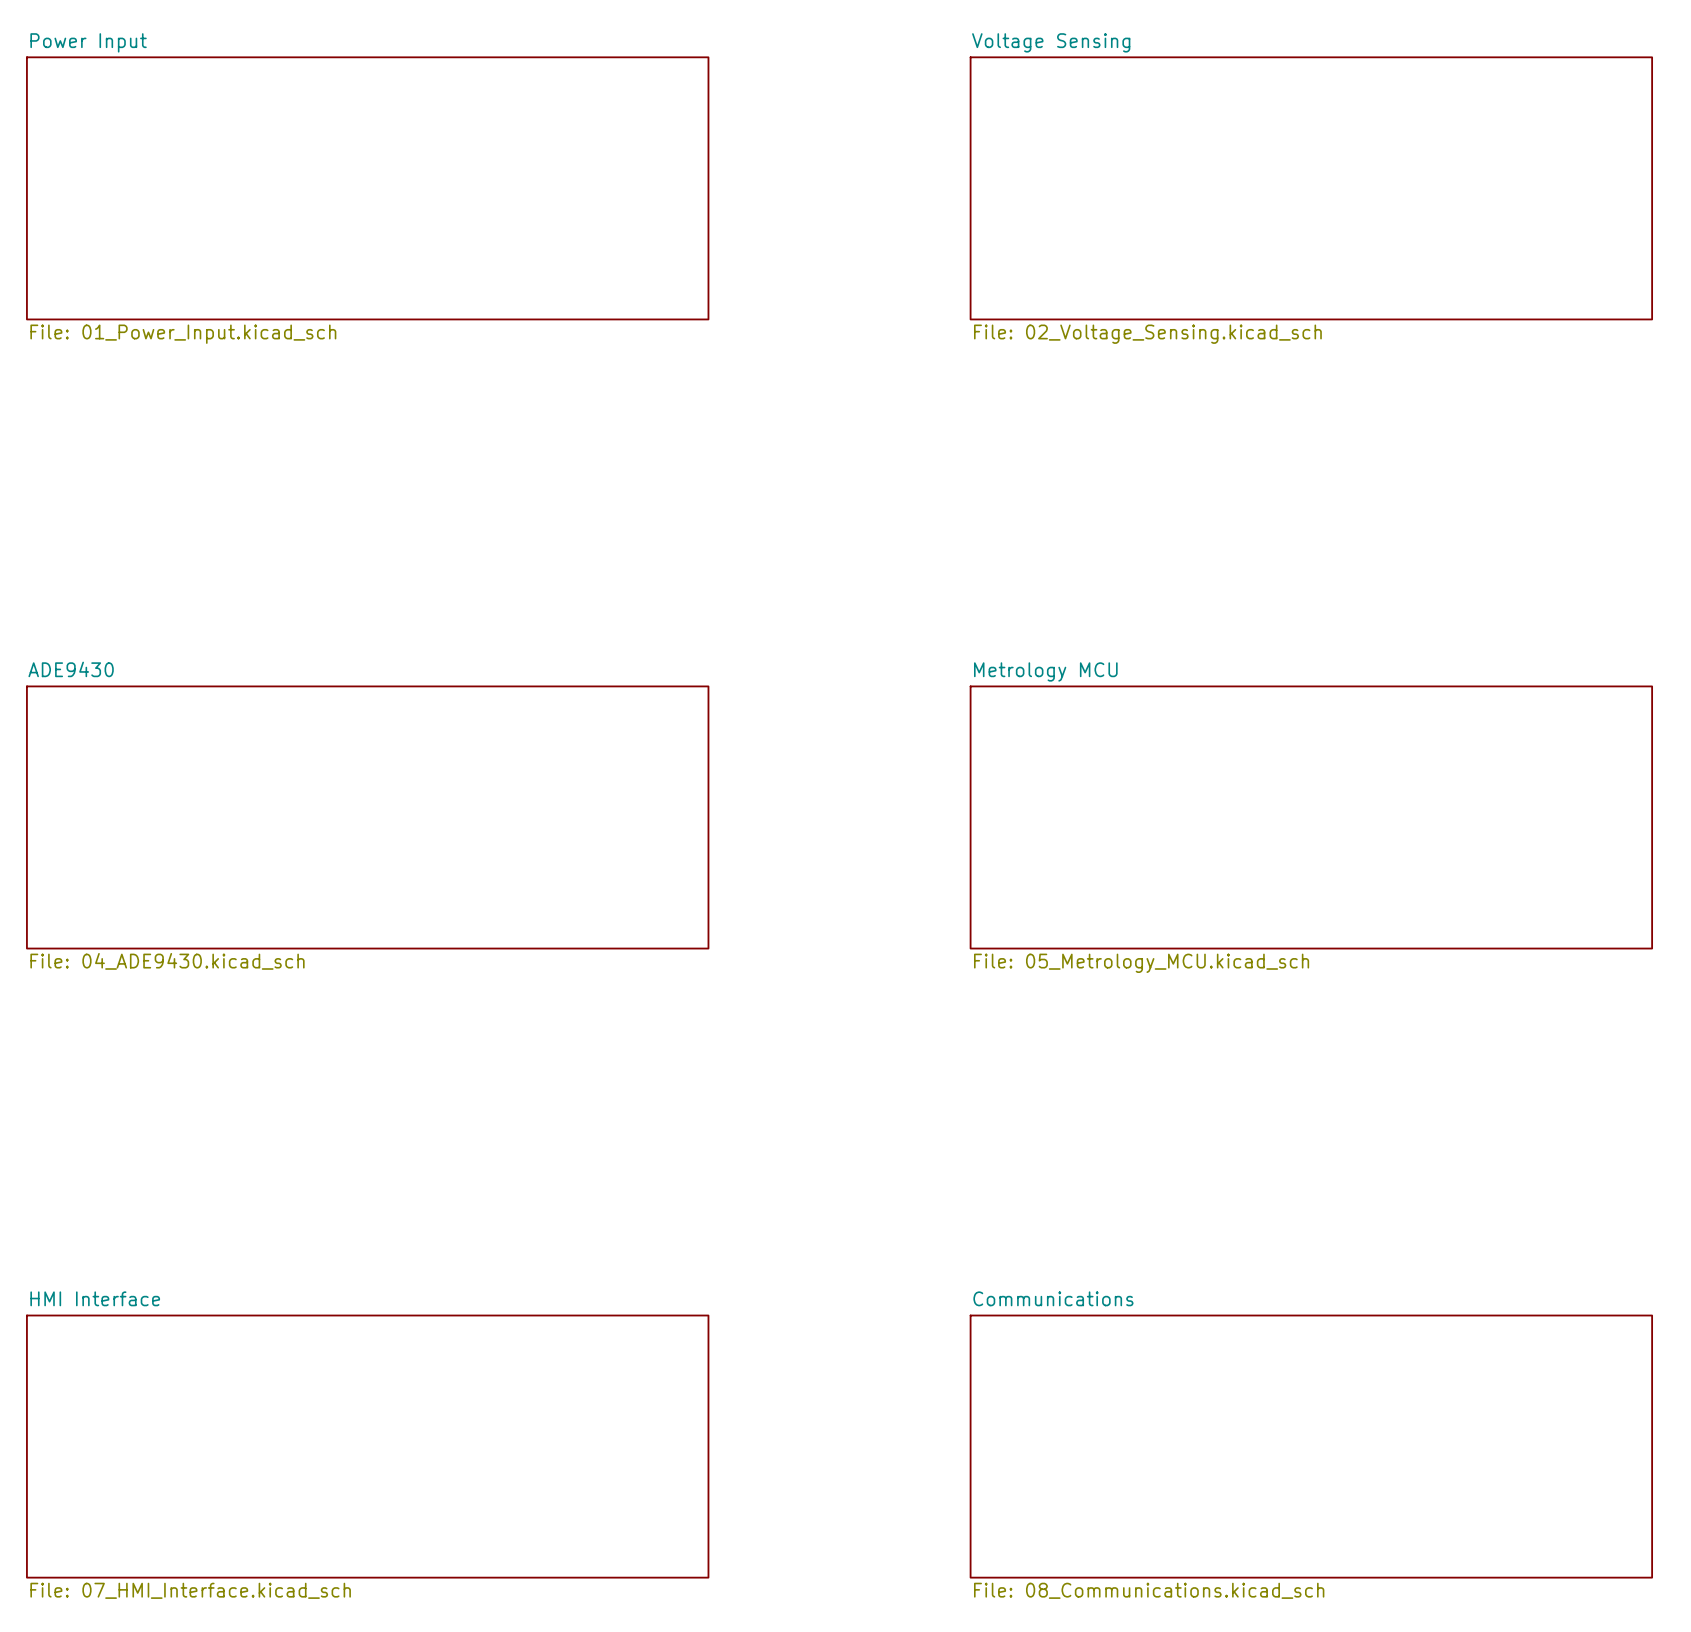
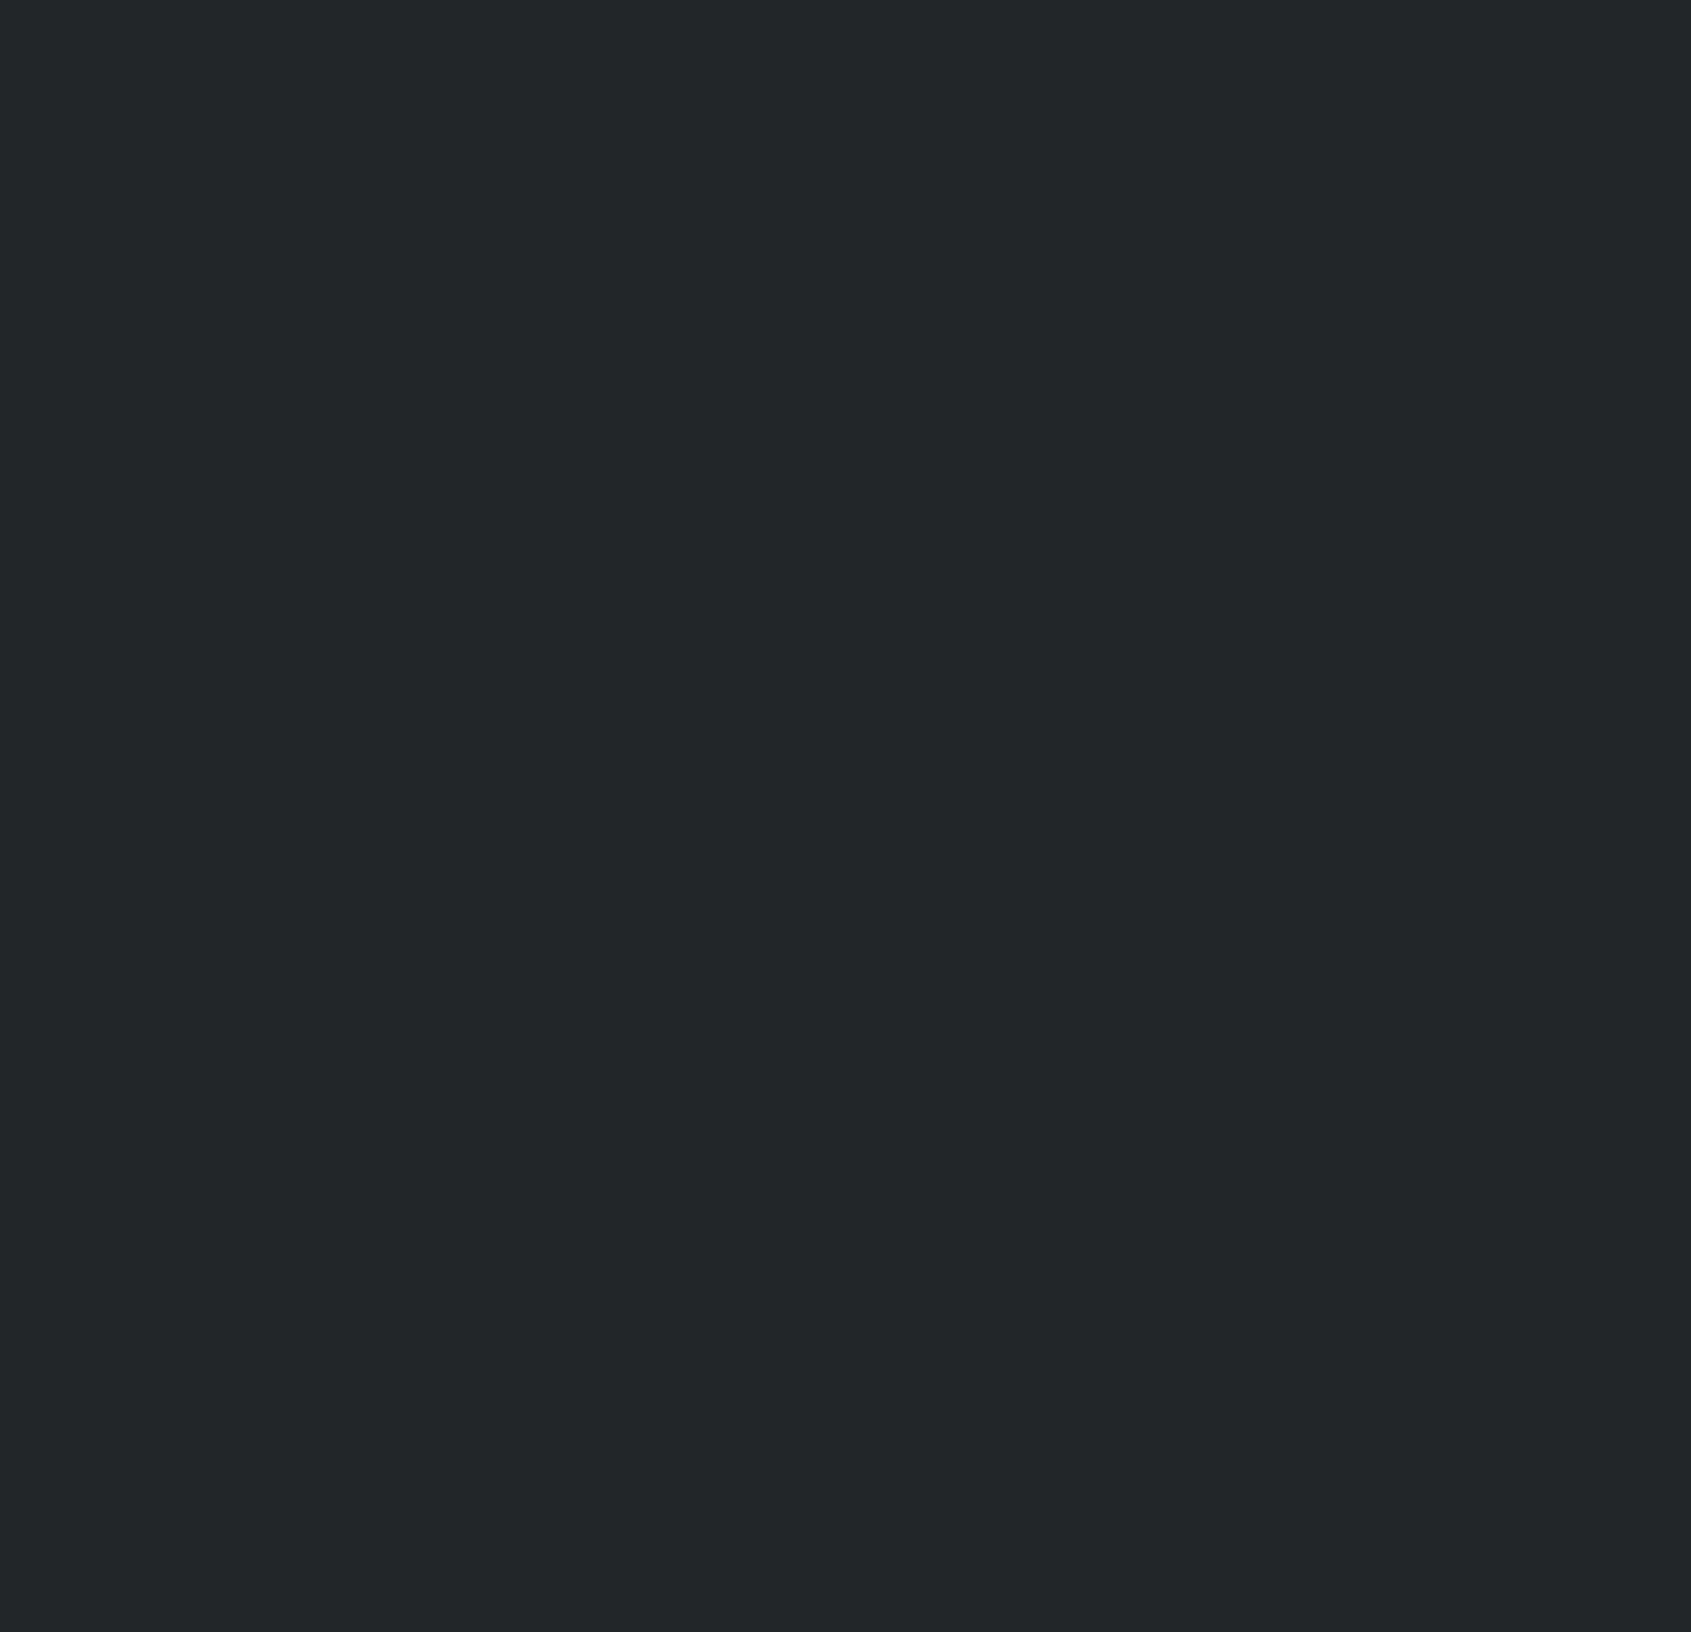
sheet Power Input: File: 01_Power_Input.kicad_sch (367, 188) -> none
sheet Voltage Sensing: File: 02_Voltage_Sensing.kicad_sch (1311, 188) -> none
sheet ADE9430: File: 04_ADE9430.kicad_sch (367, 817) -> none
sheet Metrology MCU: File: 05_Metrology_MCU.kicad_sch (1311, 817) -> none
sheet HMI Interface: File: 07_HMI_Interface.kicad_sch (367, 1446) -> none
sheet Communications: File: 08_Communications.kicad_sch (1311, 1446) -> none

